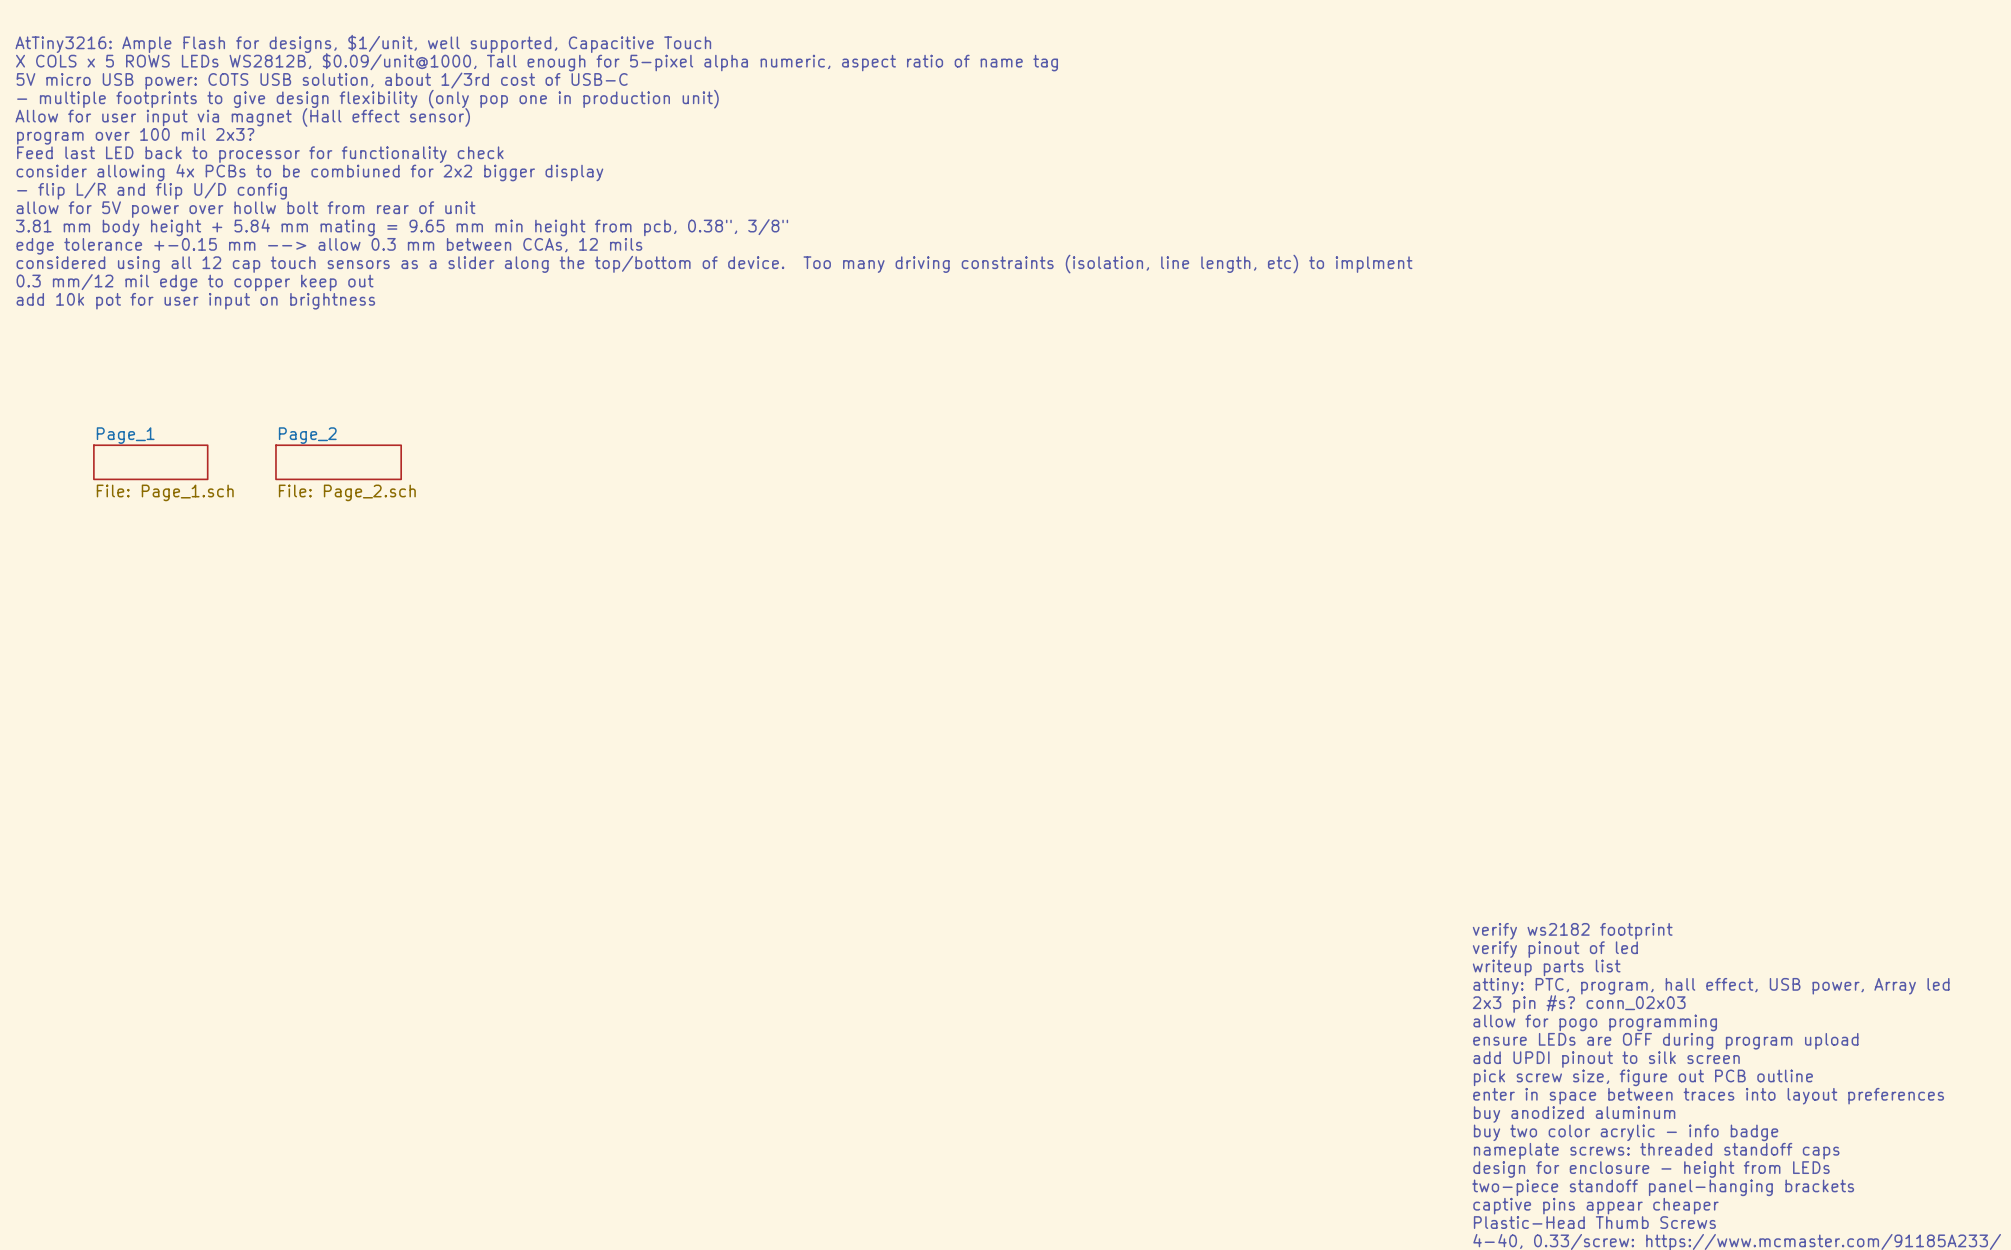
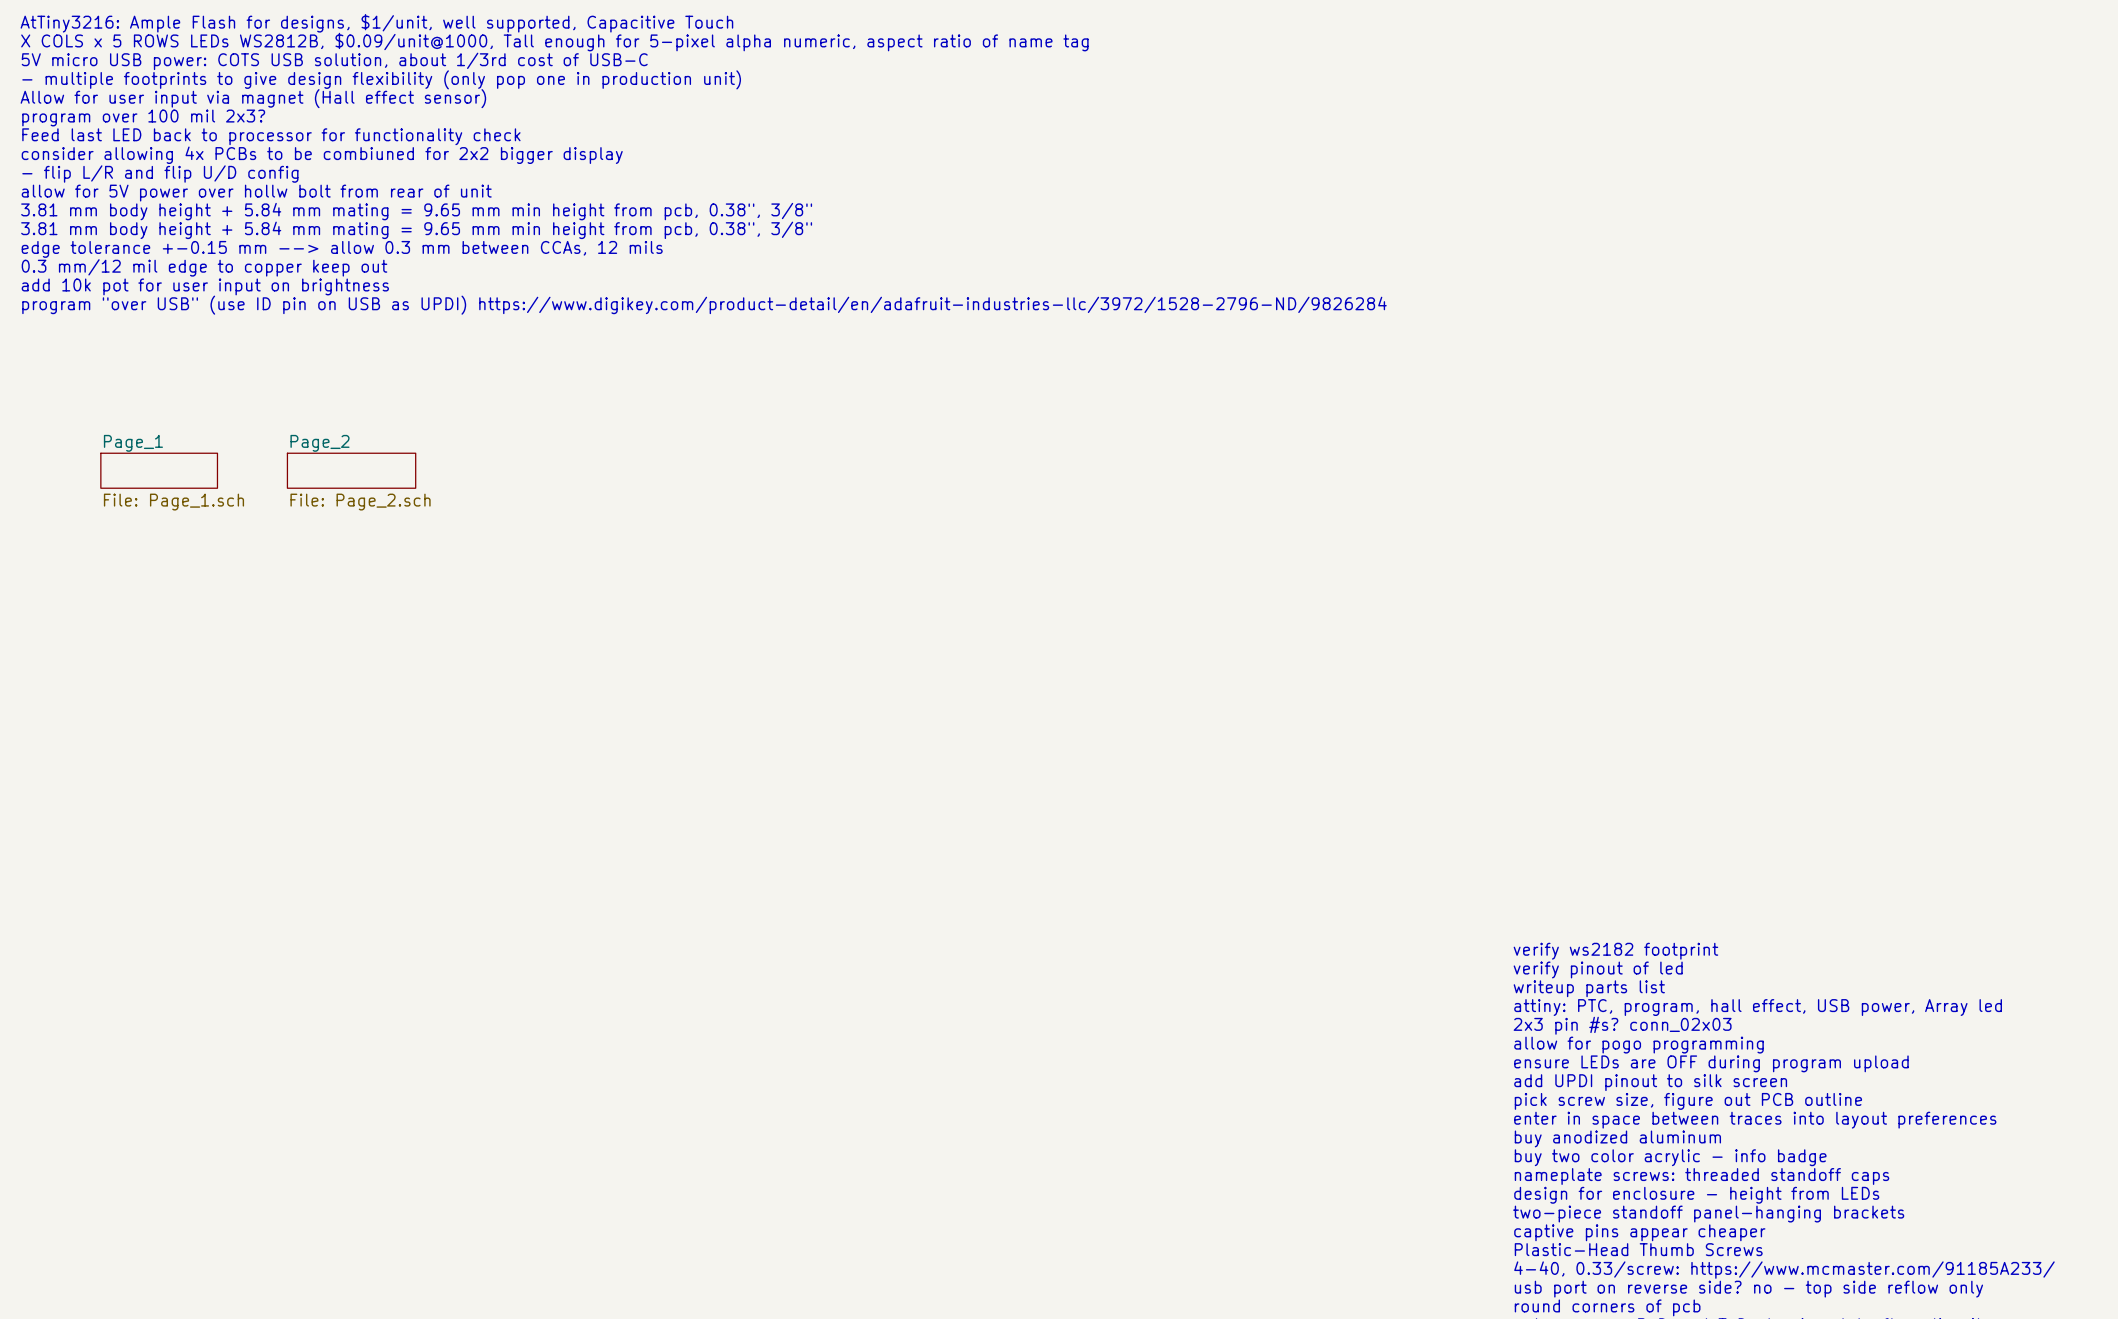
text: none -> AtTiny3216: Ample Flash for designs, $1/unit, well supported, Capacitive Touch (376, 23)
text: AtTiny3216: Ample Flash for designs, $1/unit, well supported, Capacitive Touch (363, 43) -> X COLS x 5 ROWS LEDs WS2812B, $0.09/unit@1000, Tall enough for 5-pixel alpha numeric, aspect ratio of name tag (554, 42)
text: X COLS x 5 ROWS LEDs WS2812B, $0.09/unit@1000, Tall enough for 5-pixel alpha numeric, aspect ratio of name tag (537, 62) -> 5V micro USB power: COTS USB solution, about 1/3rd cost of USB-C (334, 61)
text: 5V micro USB power: COTS USB solution, about 1/3rd cost of USB-C (322, 81) -> - multiple footprints to give design flexibility (only pop one in production unit) (381, 79)
text: - multiple footprints to give design flexibility (only pop one in production unit) (367, 99) -> Allow for user input via magnet (Hall effect sensor) (253, 98)
text: Allow for user input via magnet (Hall effect sensor) (242, 117) -> program over 100 mil 2x3? (143, 117)
text: program over 100 mil 2x3? (135, 136) -> Feed last LED back to processor for functionality check (271, 136)
text: Feed last LED back to processor for functionality check (260, 154) -> consider allowing 4x PCBs to be combiuned for 2x2 bigger display (322, 155)
text: consider allowing 4x PCBs to be combiuned for 2x2 bigger display (309, 172) -> - flip L/R and flip U/D config (160, 174)
text: - flip L/R and flip U/D config (151, 191) -> allow for 5V power over hollw bolt from rear of unit (256, 193)
text: allow for 5V power over hollw bolt from rear of unit (245, 209) -> 3.81 mm body height + 5.84 mm mating = 9.65 mm min height from pcb, 0.38", 3/8" (416, 211)
text: considered using all 12 cap touch sensors as a slider along the top/bottom of device. Too many driving constraints (isolation, line length, etc) to implment (714, 264) -> 0.3 mm/12 mil edge to copper keep out (204, 267)
text: 0.3 mm/12 mil edge to copper keep out (195, 282) -> add 10k pot for user input on brightness (205, 286)
text: add 10k pot for user input on brightness (195, 301) -> program "over USB" (use ID pin on USB as UPDI) https://www.digikey.com/product-detail/en/adafruit-industries-llc/3972/1528-2796-ND/9826284 (704, 305)

